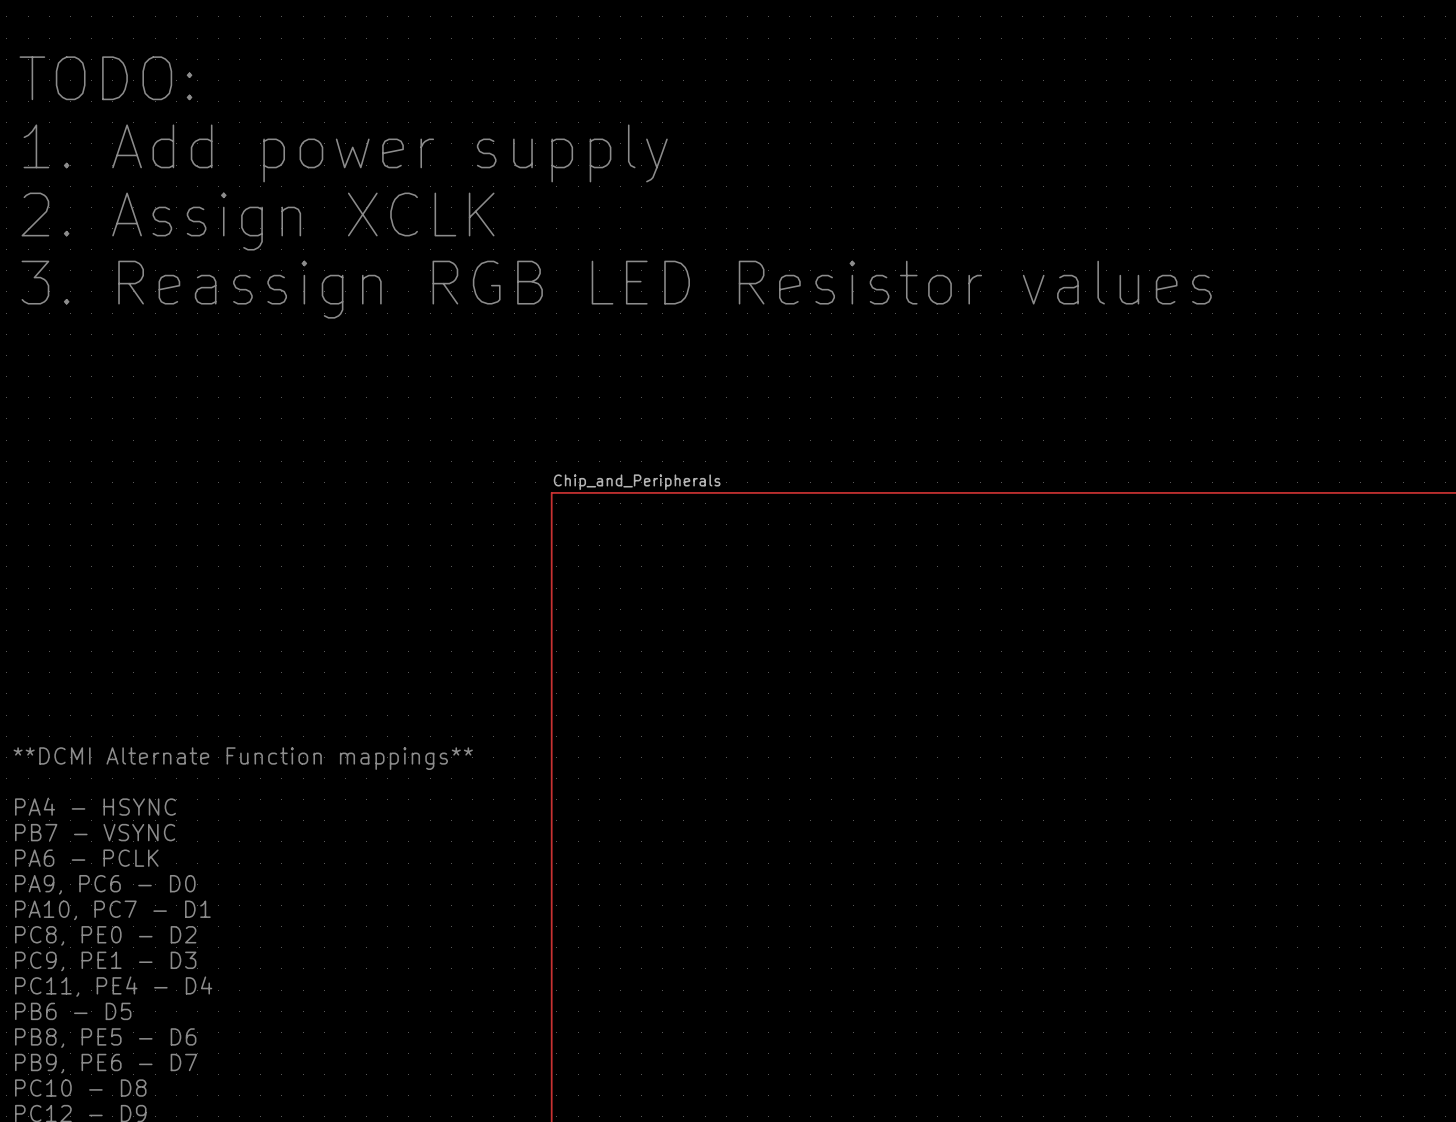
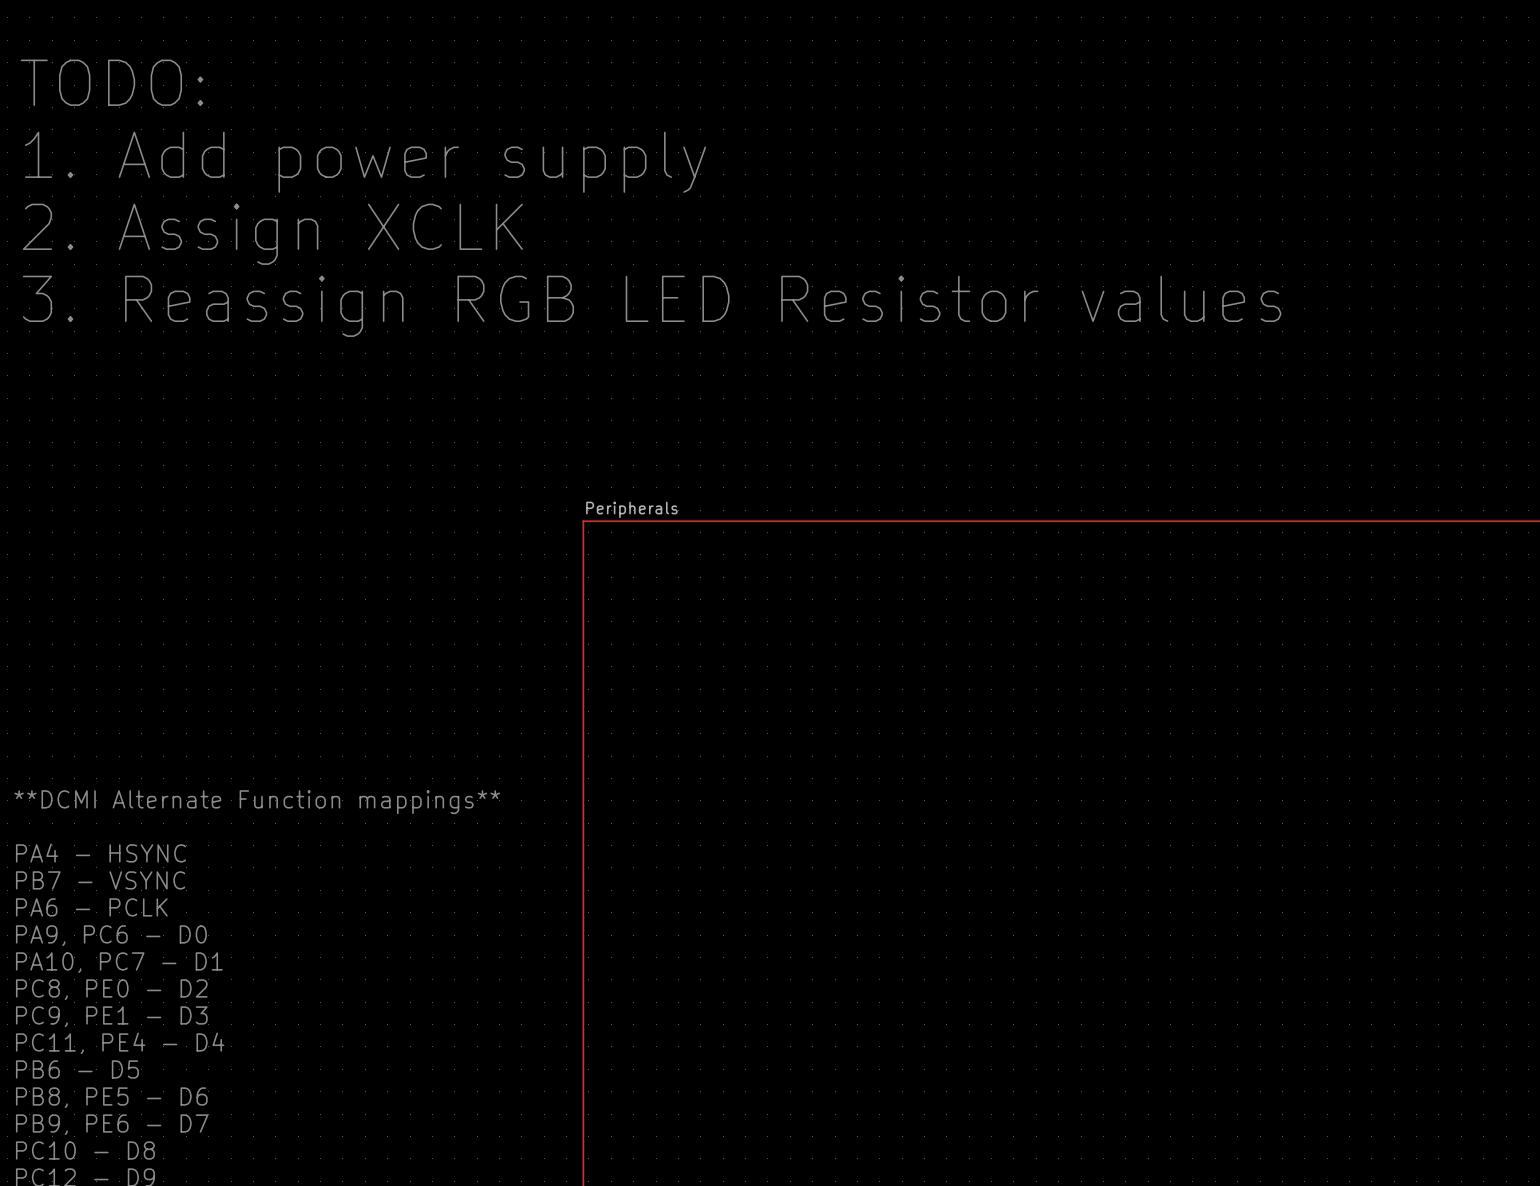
sheet Chip_and_Peripherals name: Chip_and_Peripherals (637, 482) -> Peripherals (631, 509)

